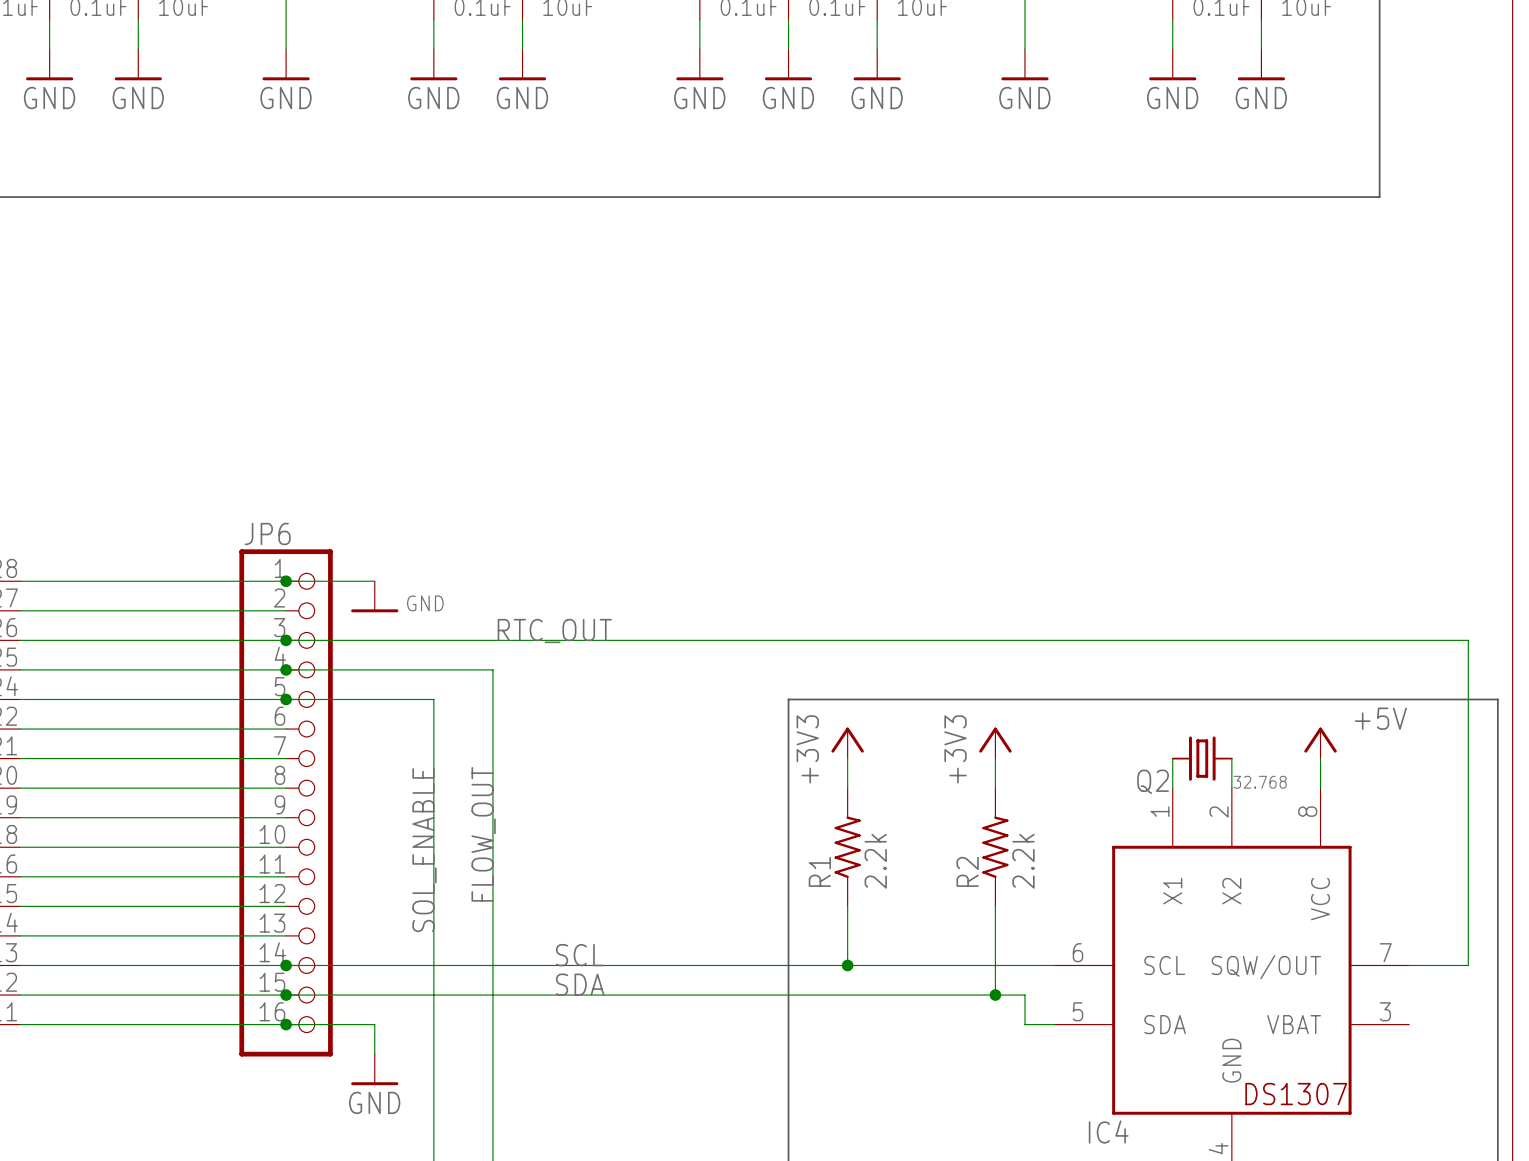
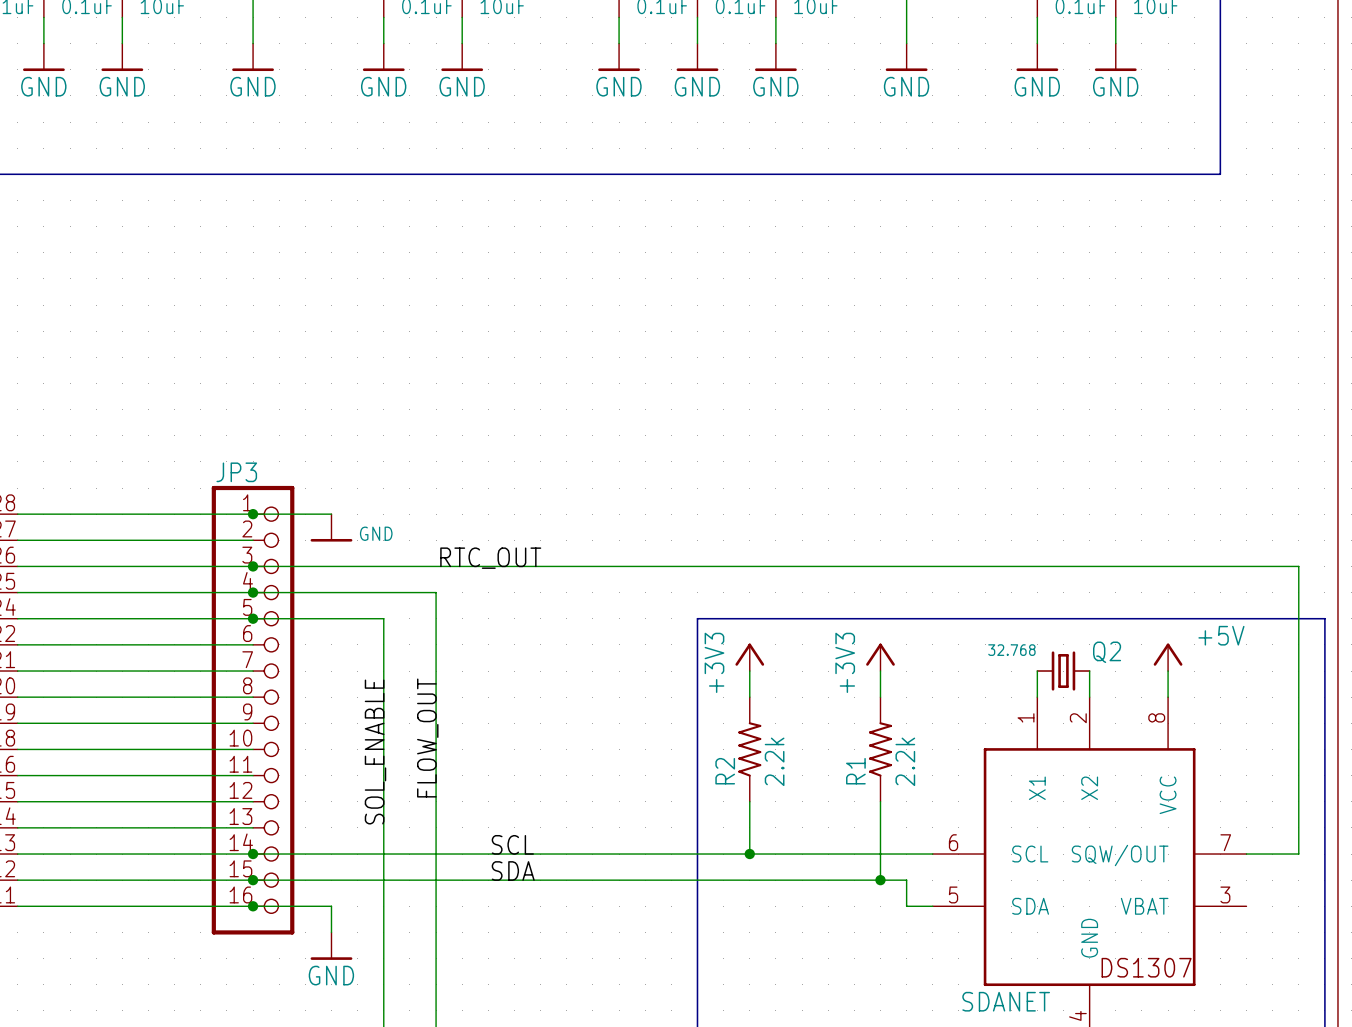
JP6 name: JP6 (267, 533) -> JP3 (236, 472)
Q2 name position: Q2 (1153, 781) -> Q2 (1107, 652)
Q2 value position: 32.768 (1260, 782) -> 32.768 (1011, 650)
R1 name: R1 (819, 871) -> R2 (725, 771)
R2 name: R2 (967, 871) -> R1 (855, 771)
IC4 name: IC4 (1108, 1131) -> SDANET (1006, 1001)

